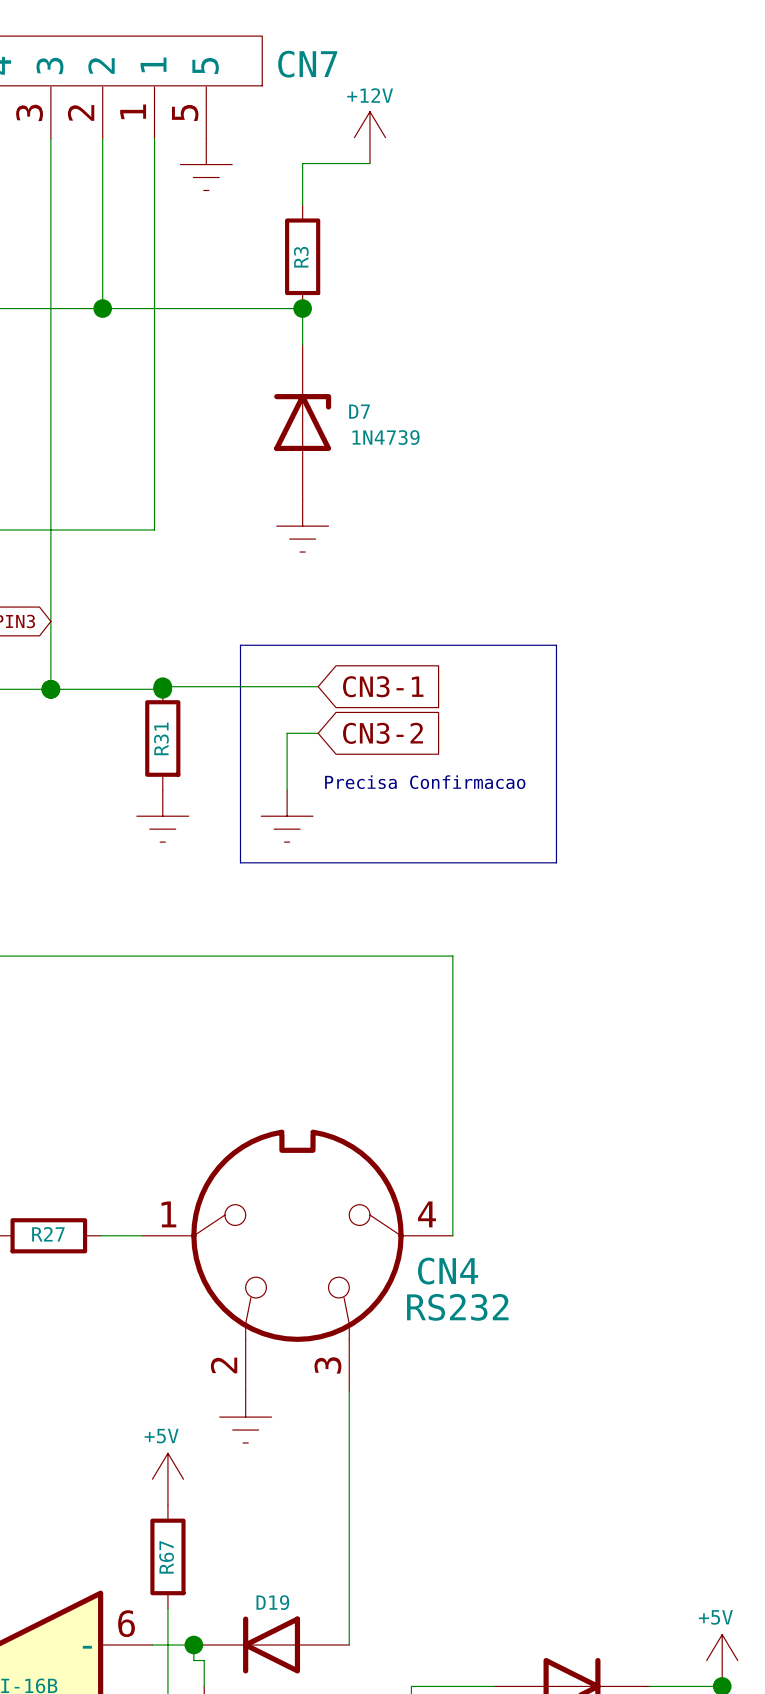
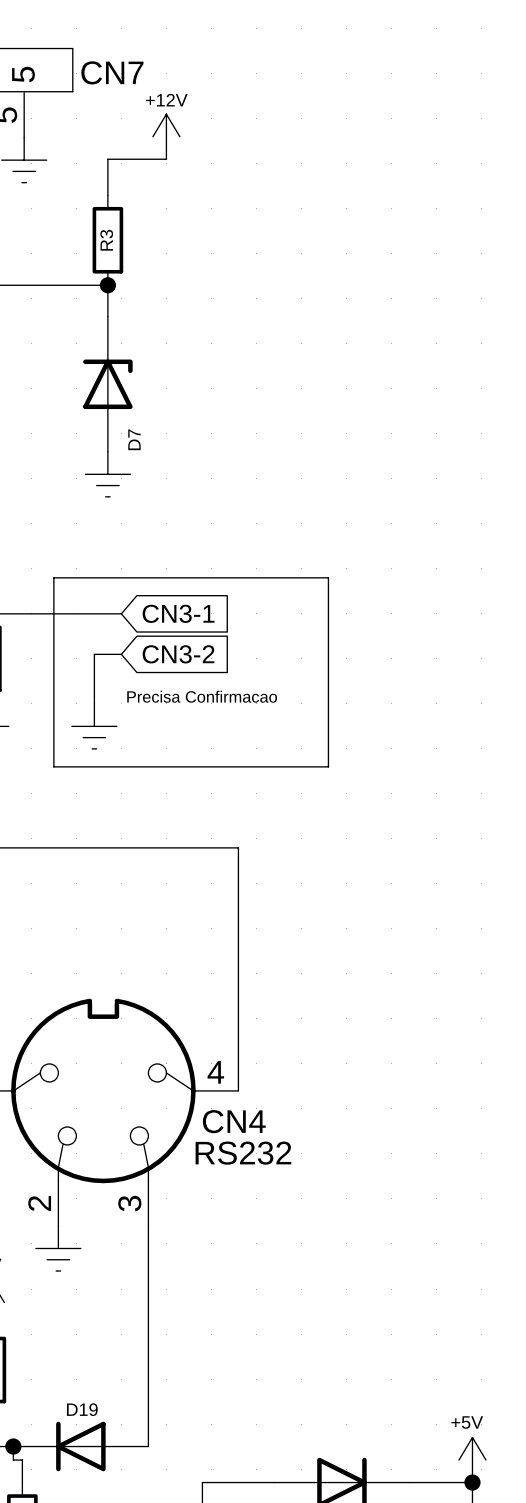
D7 name rotation: 0° (359, 411) -> 90° counterclockwise (134, 439)
D7 name position: D7 (359, 411) -> D7 (134, 439)
D7 value: 1N4739 (386, 437) -> none

